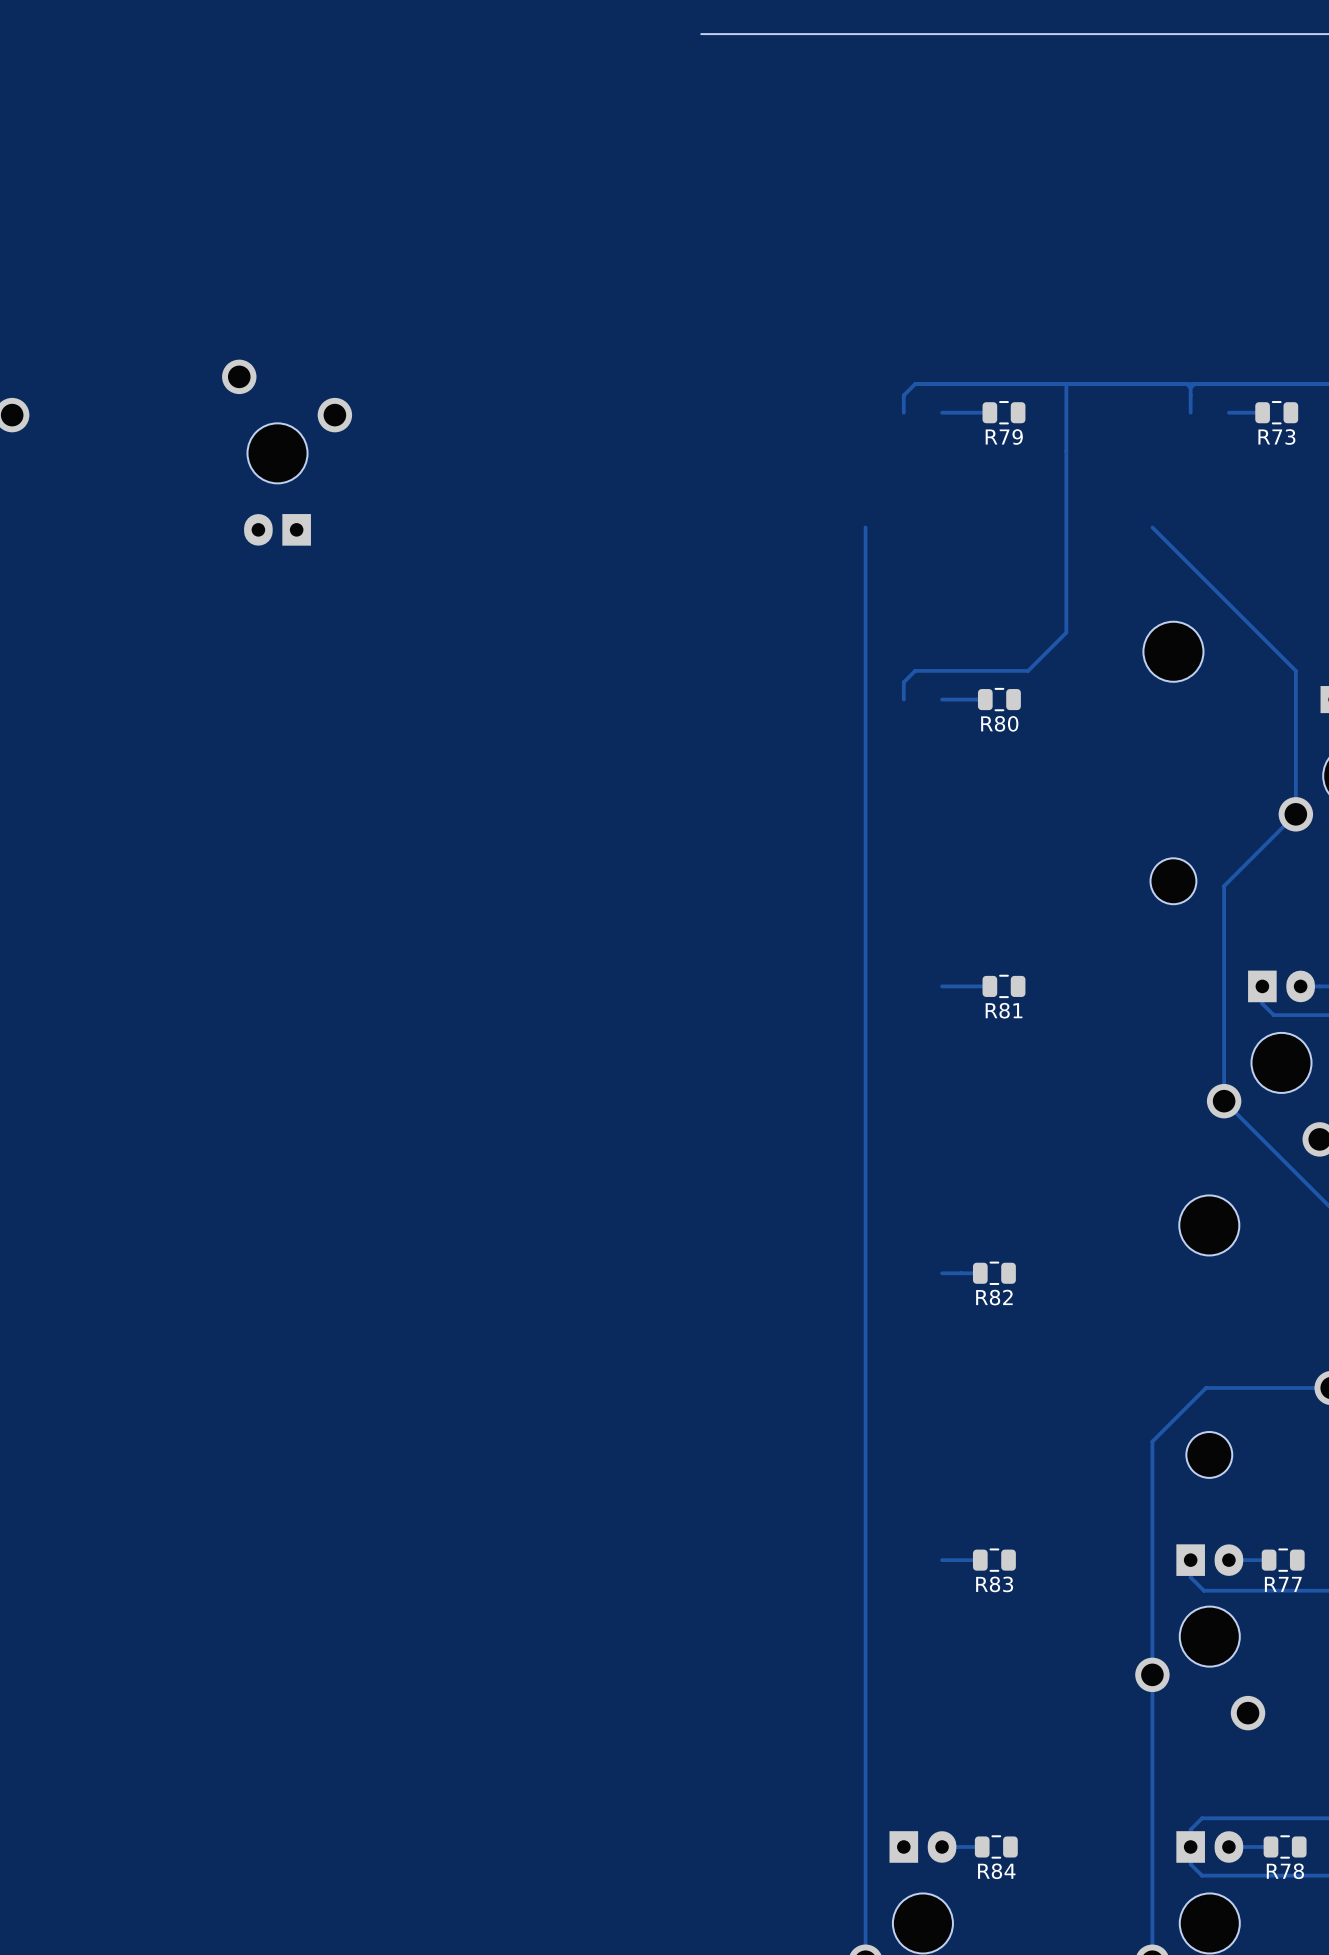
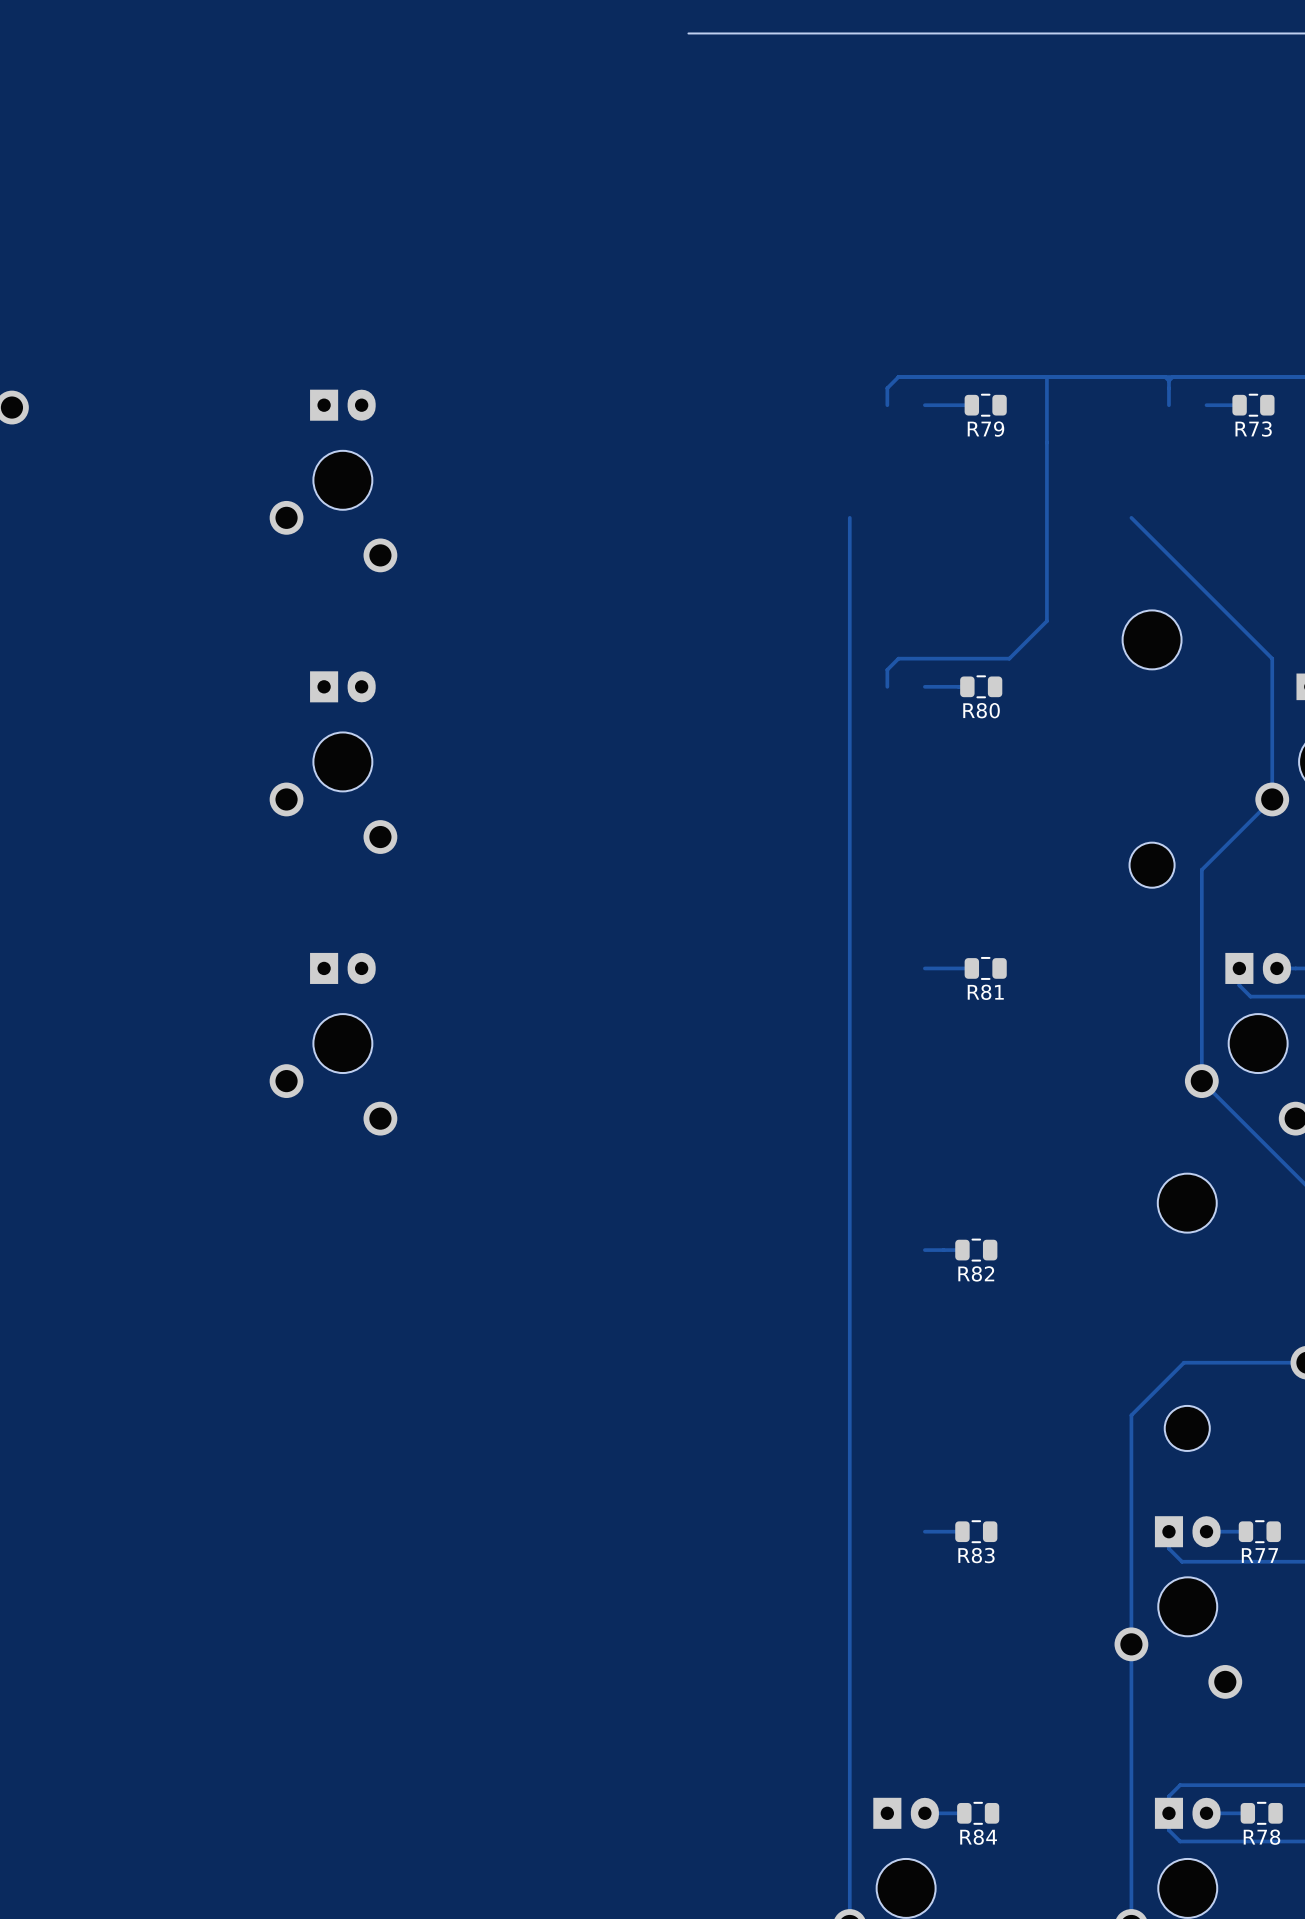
part rotation: 0° (287, 452) -> 180° (333, 480)
part: none -> (333, 762)
part: none -> (333, 1044)

